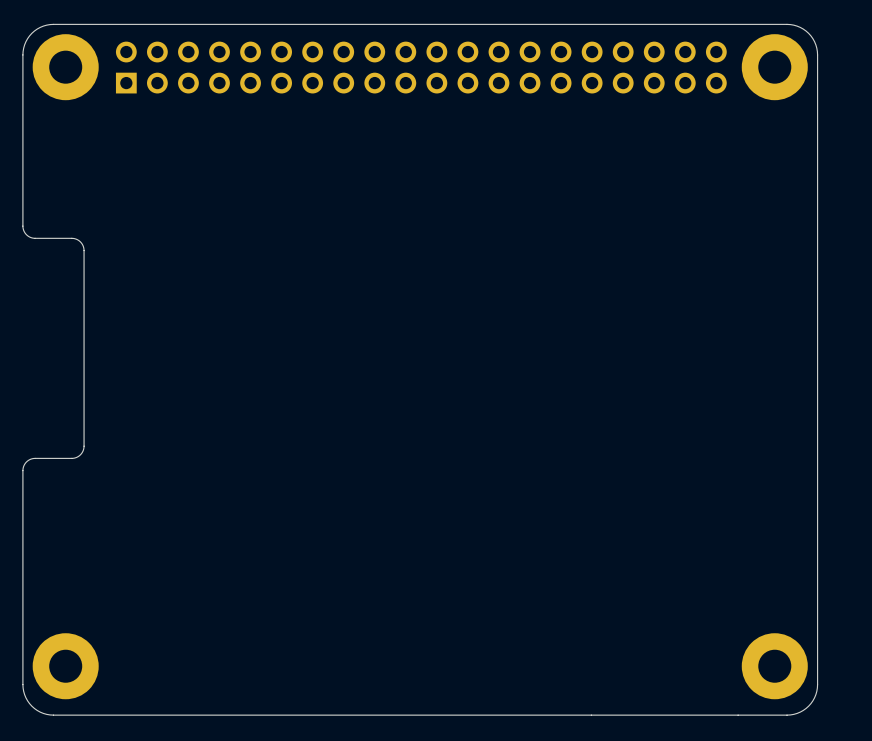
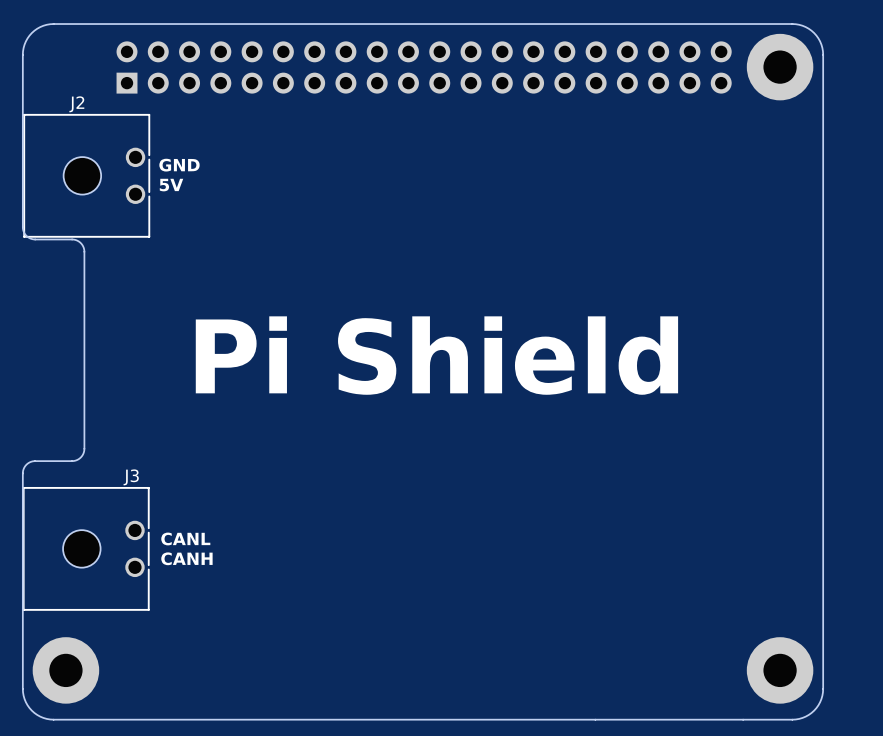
part: (65, 67) -> none
text: none -> GND (179, 165)
J2: none -> (86, 175)
text: none -> 5V (171, 185)
text: none -> Pi Shield (436, 355)
text: none -> CANL (185, 538)
J3: none -> (86, 548)
text: none -> CANH (186, 558)

